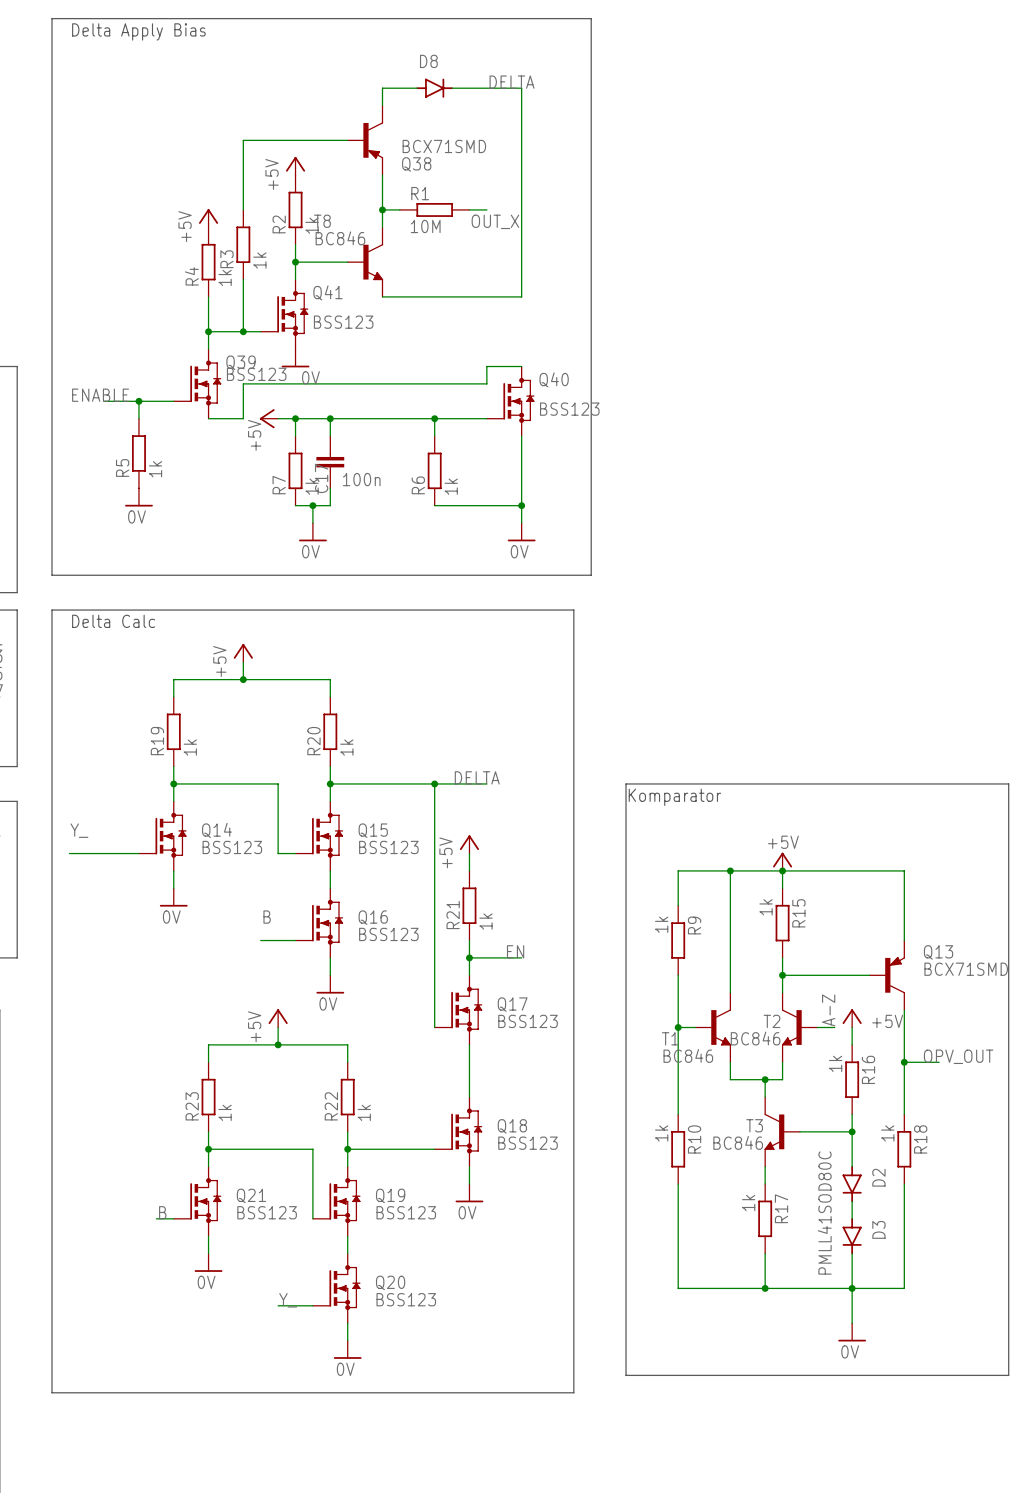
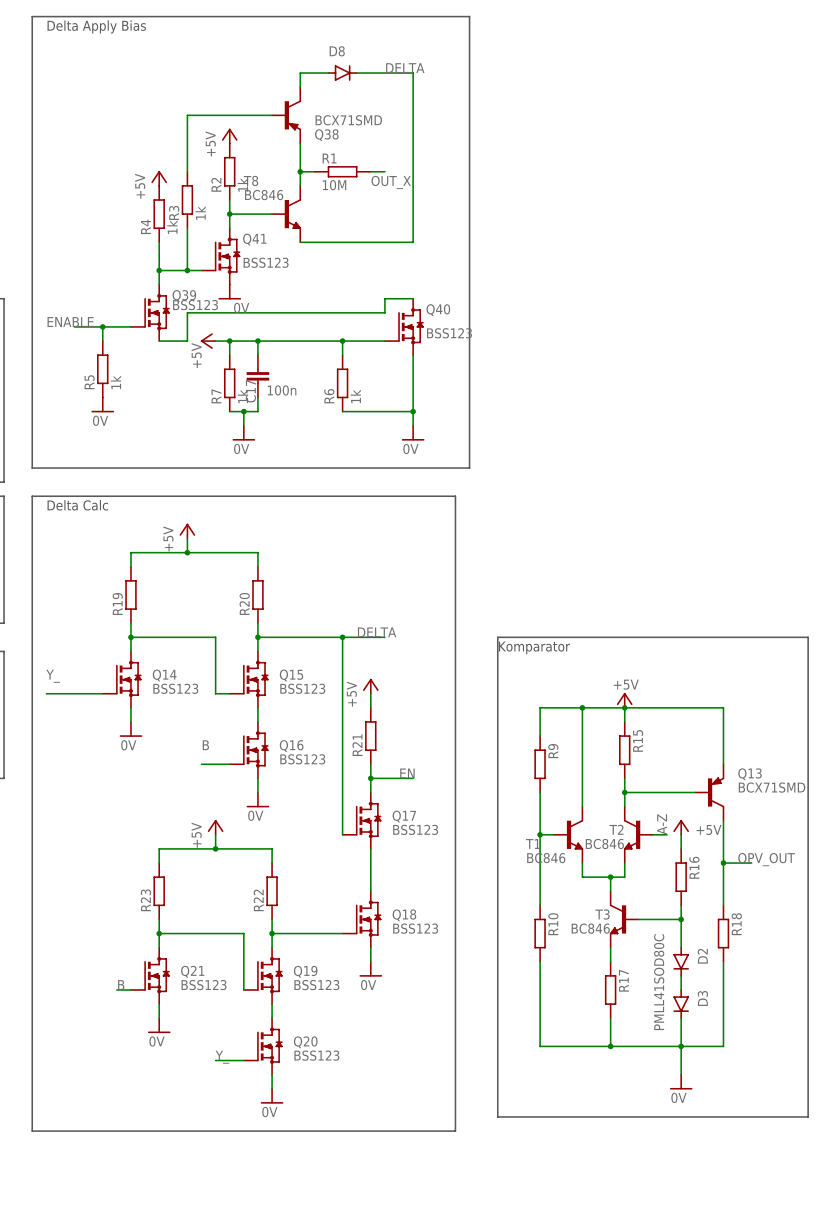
R19 value: 1k (190, 747) -> none
R20 value: 1k (346, 747) -> none
R15 value: 1k (766, 907) -> none
R21 value: 1k (485, 921) -> none
R9 value: 1k (661, 924) -> none
R16 value: 1k (835, 1063) -> none
R23 value: 1k (225, 1112) -> none
R22 value: 1k (364, 1112) -> none
R10 value: 1k (661, 1133) -> none
R18 value: 1k (887, 1133) -> none
R17 value: 1k (748, 1203) -> none

